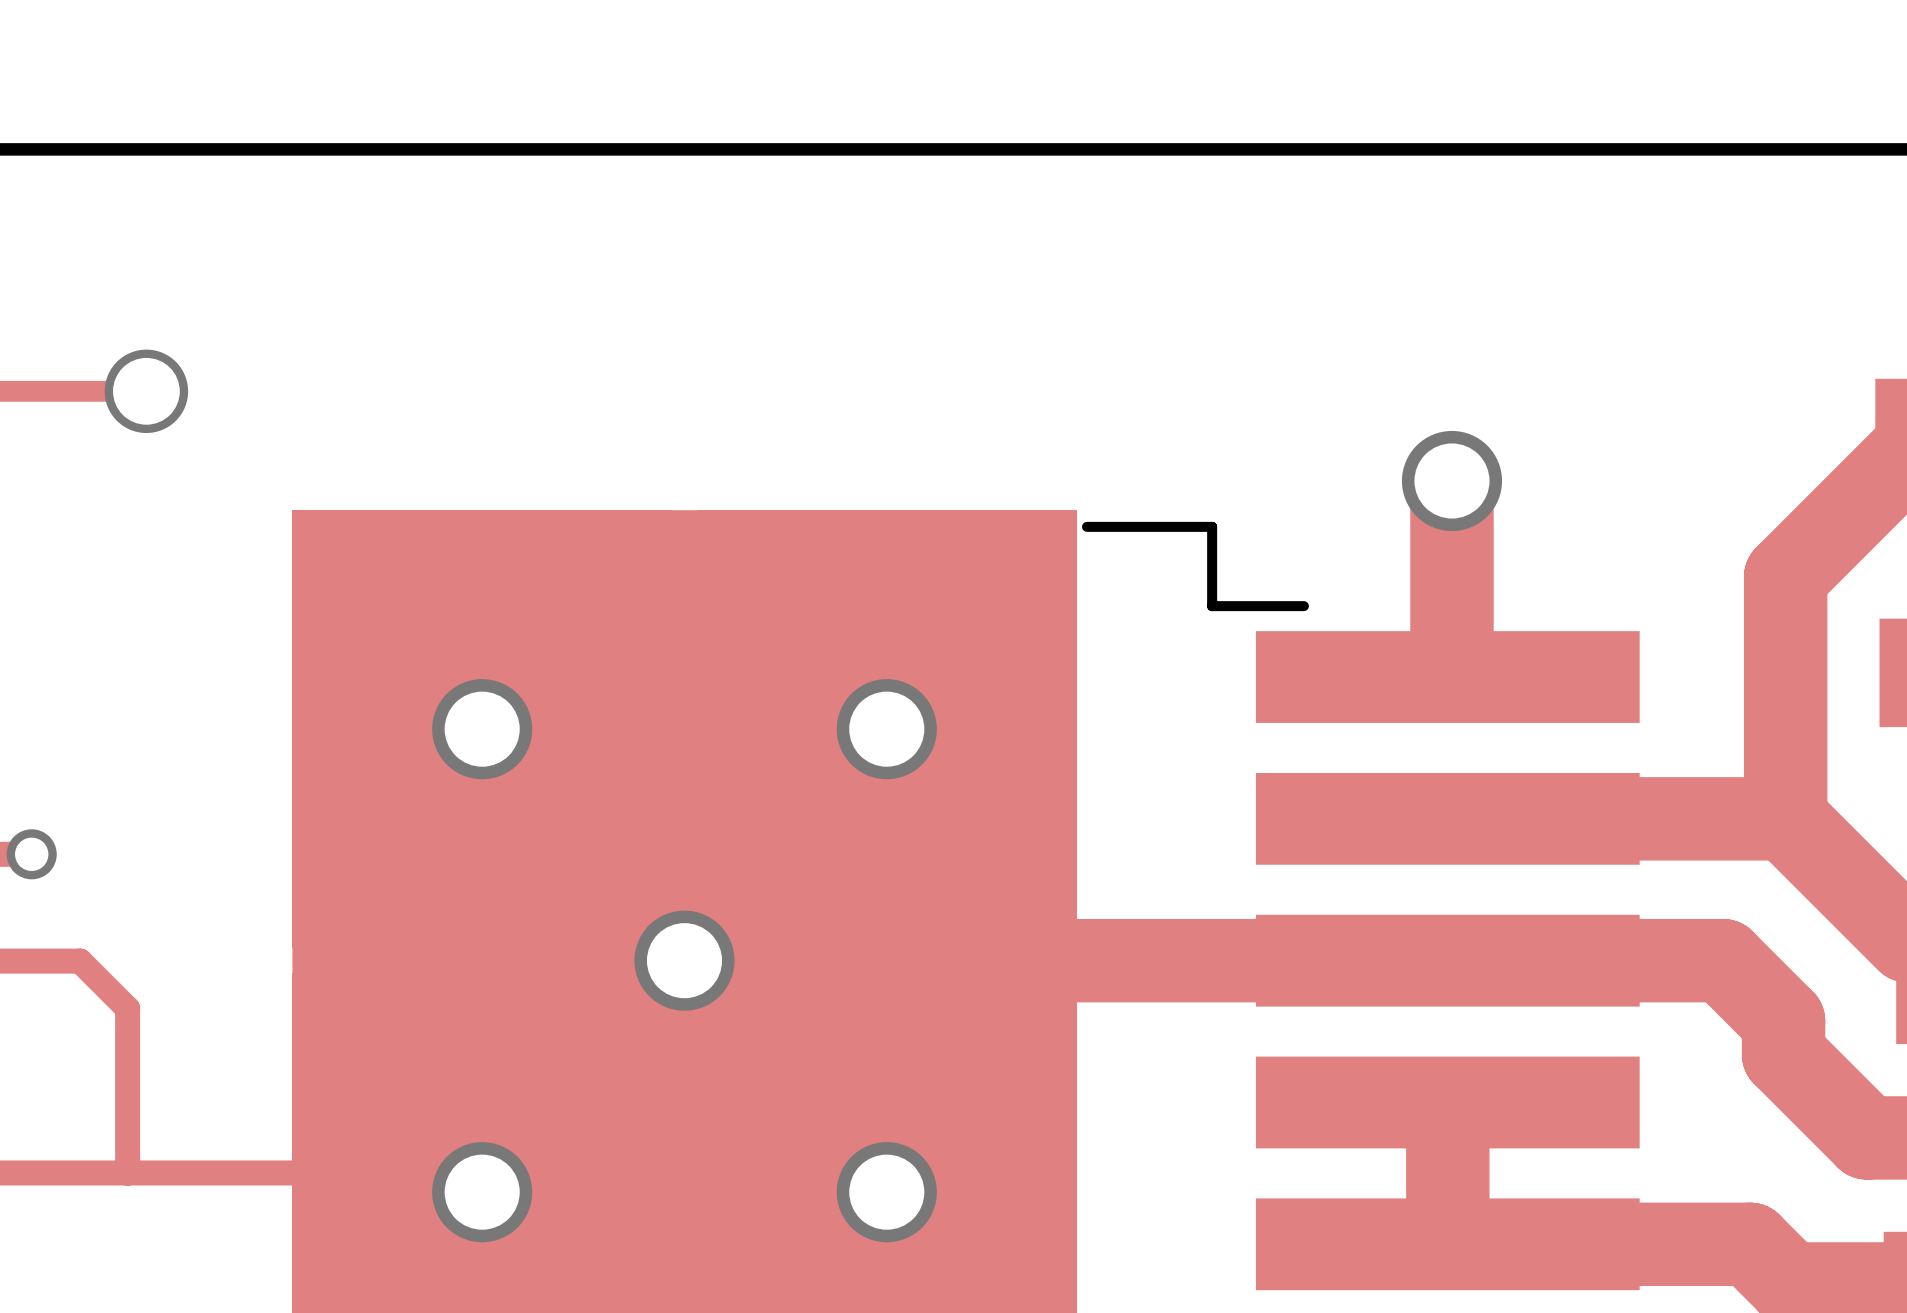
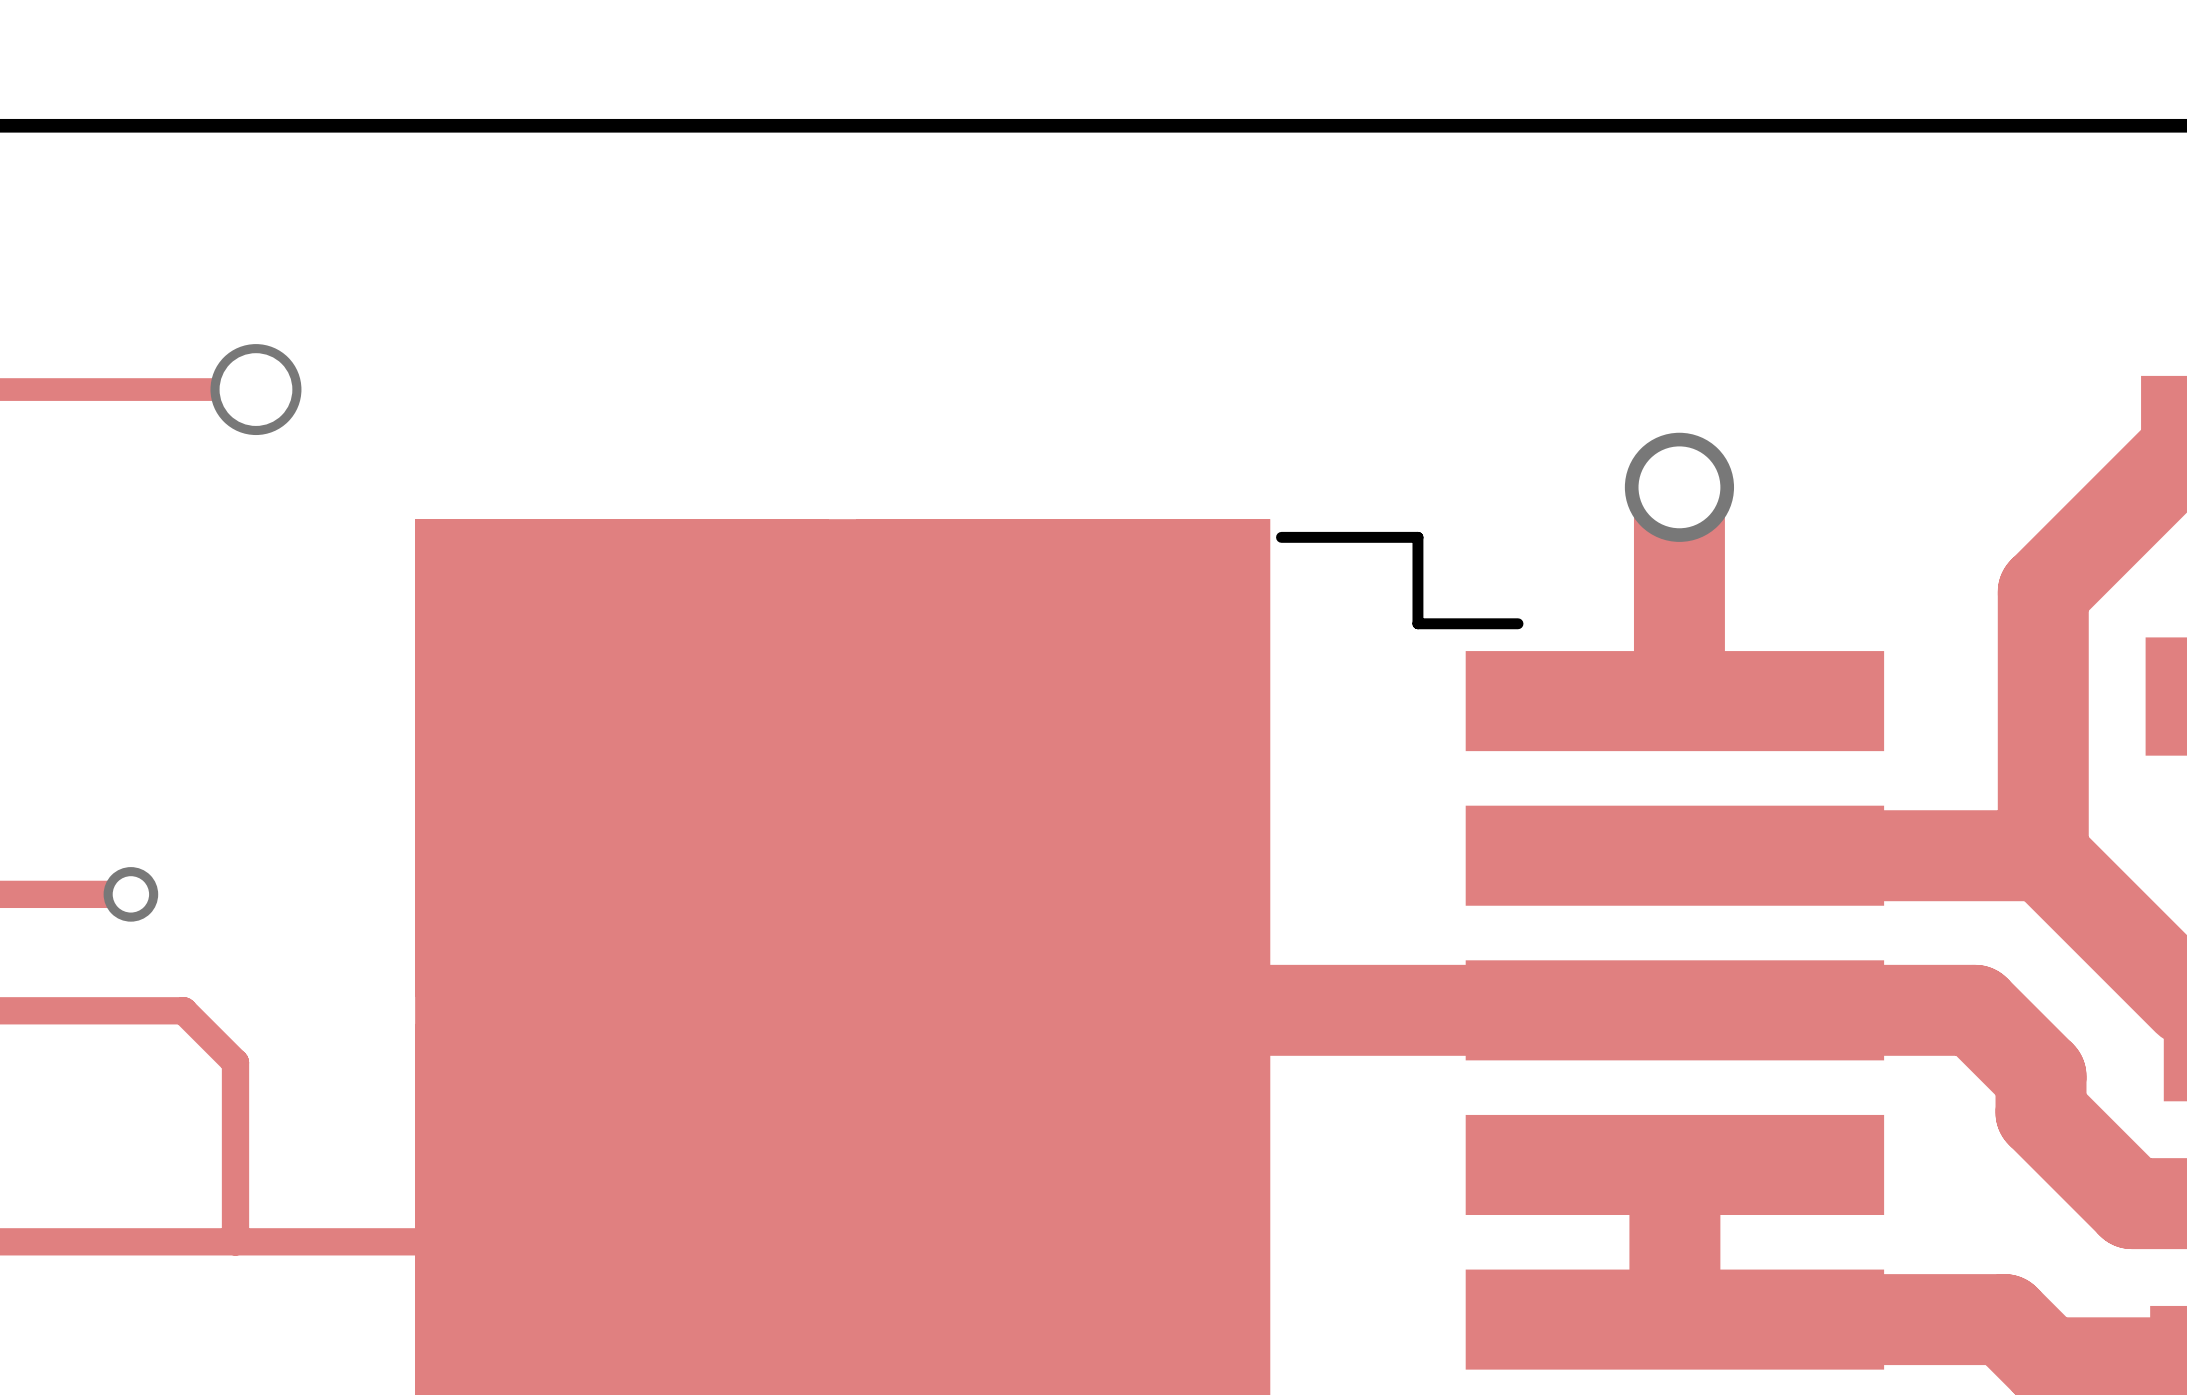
via: (482, 729) -> none
via: (886, 729) -> none
via: (684, 960) -> none
via: (482, 1192) -> none
via: (886, 1192) -> none

